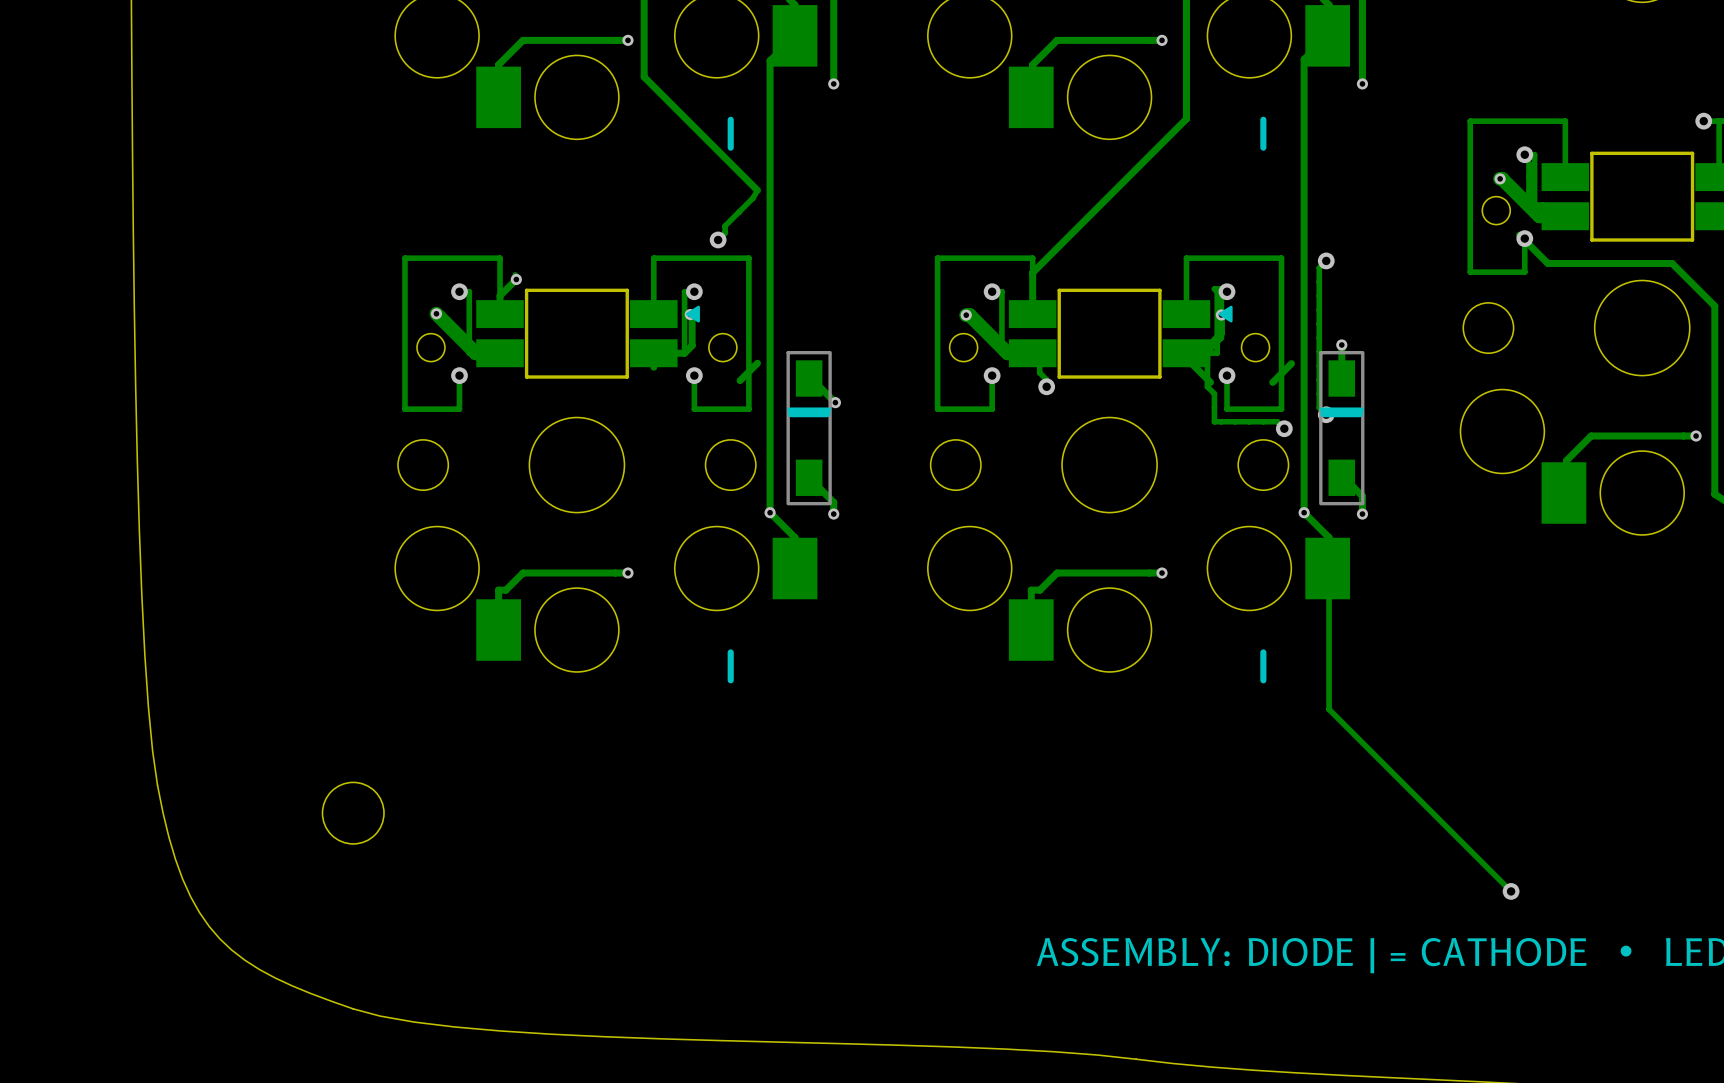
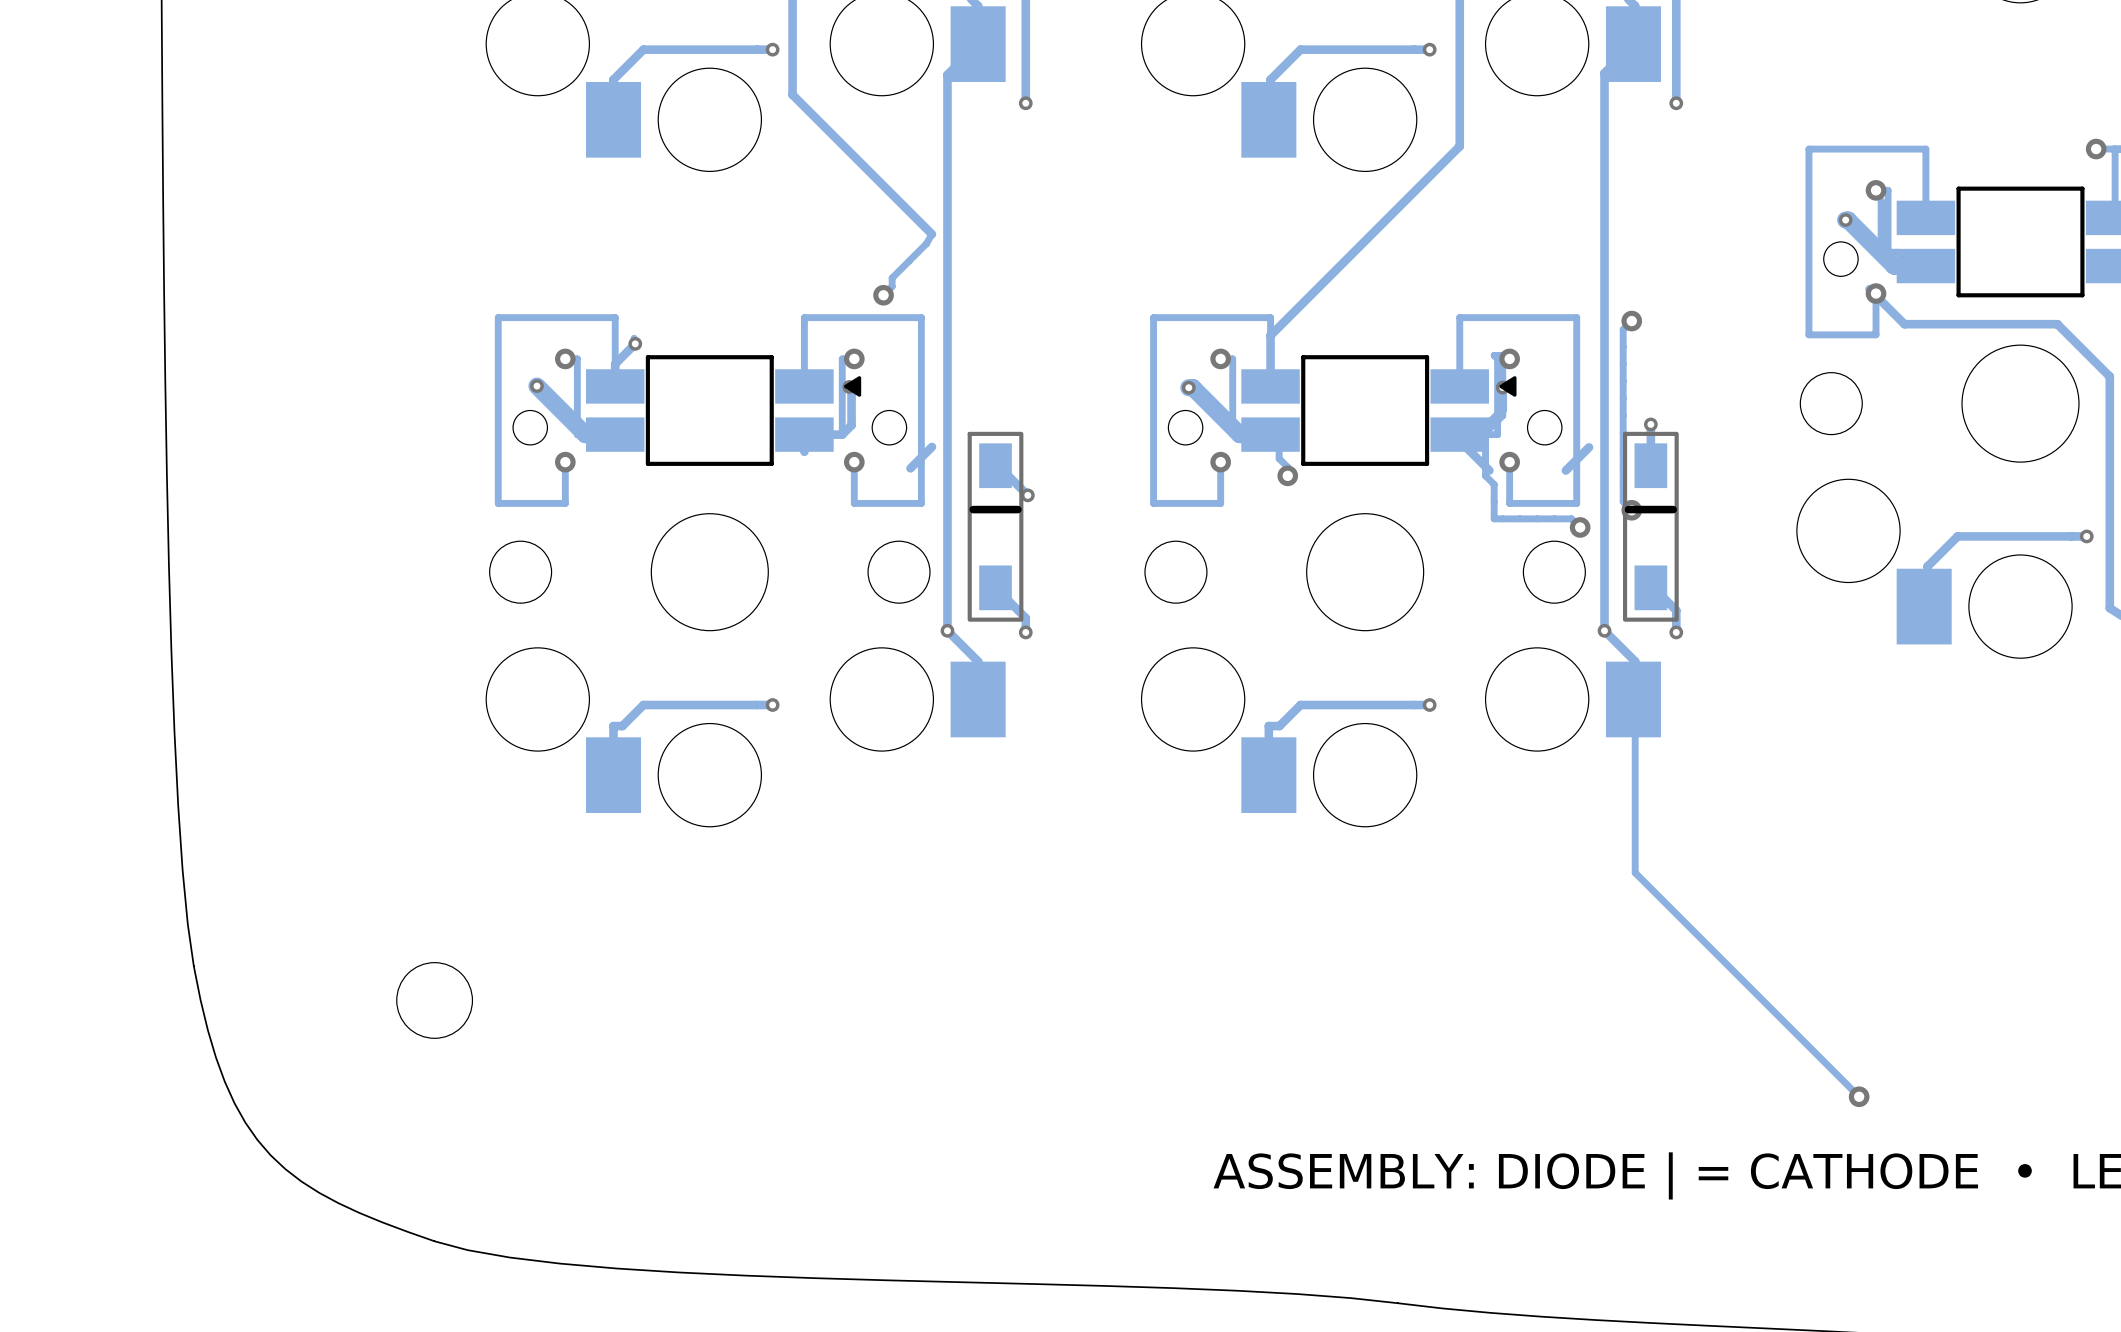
line: (730, 119) (730, 147) -> none
line: (1263, 119) (1263, 147) -> none
line: (828, 409) (789, 409) -> none
line: (1361, 409) (1322, 409) -> none
line: (730, 652) (730, 680) -> none
line: (1263, 652) (1263, 680) -> none

